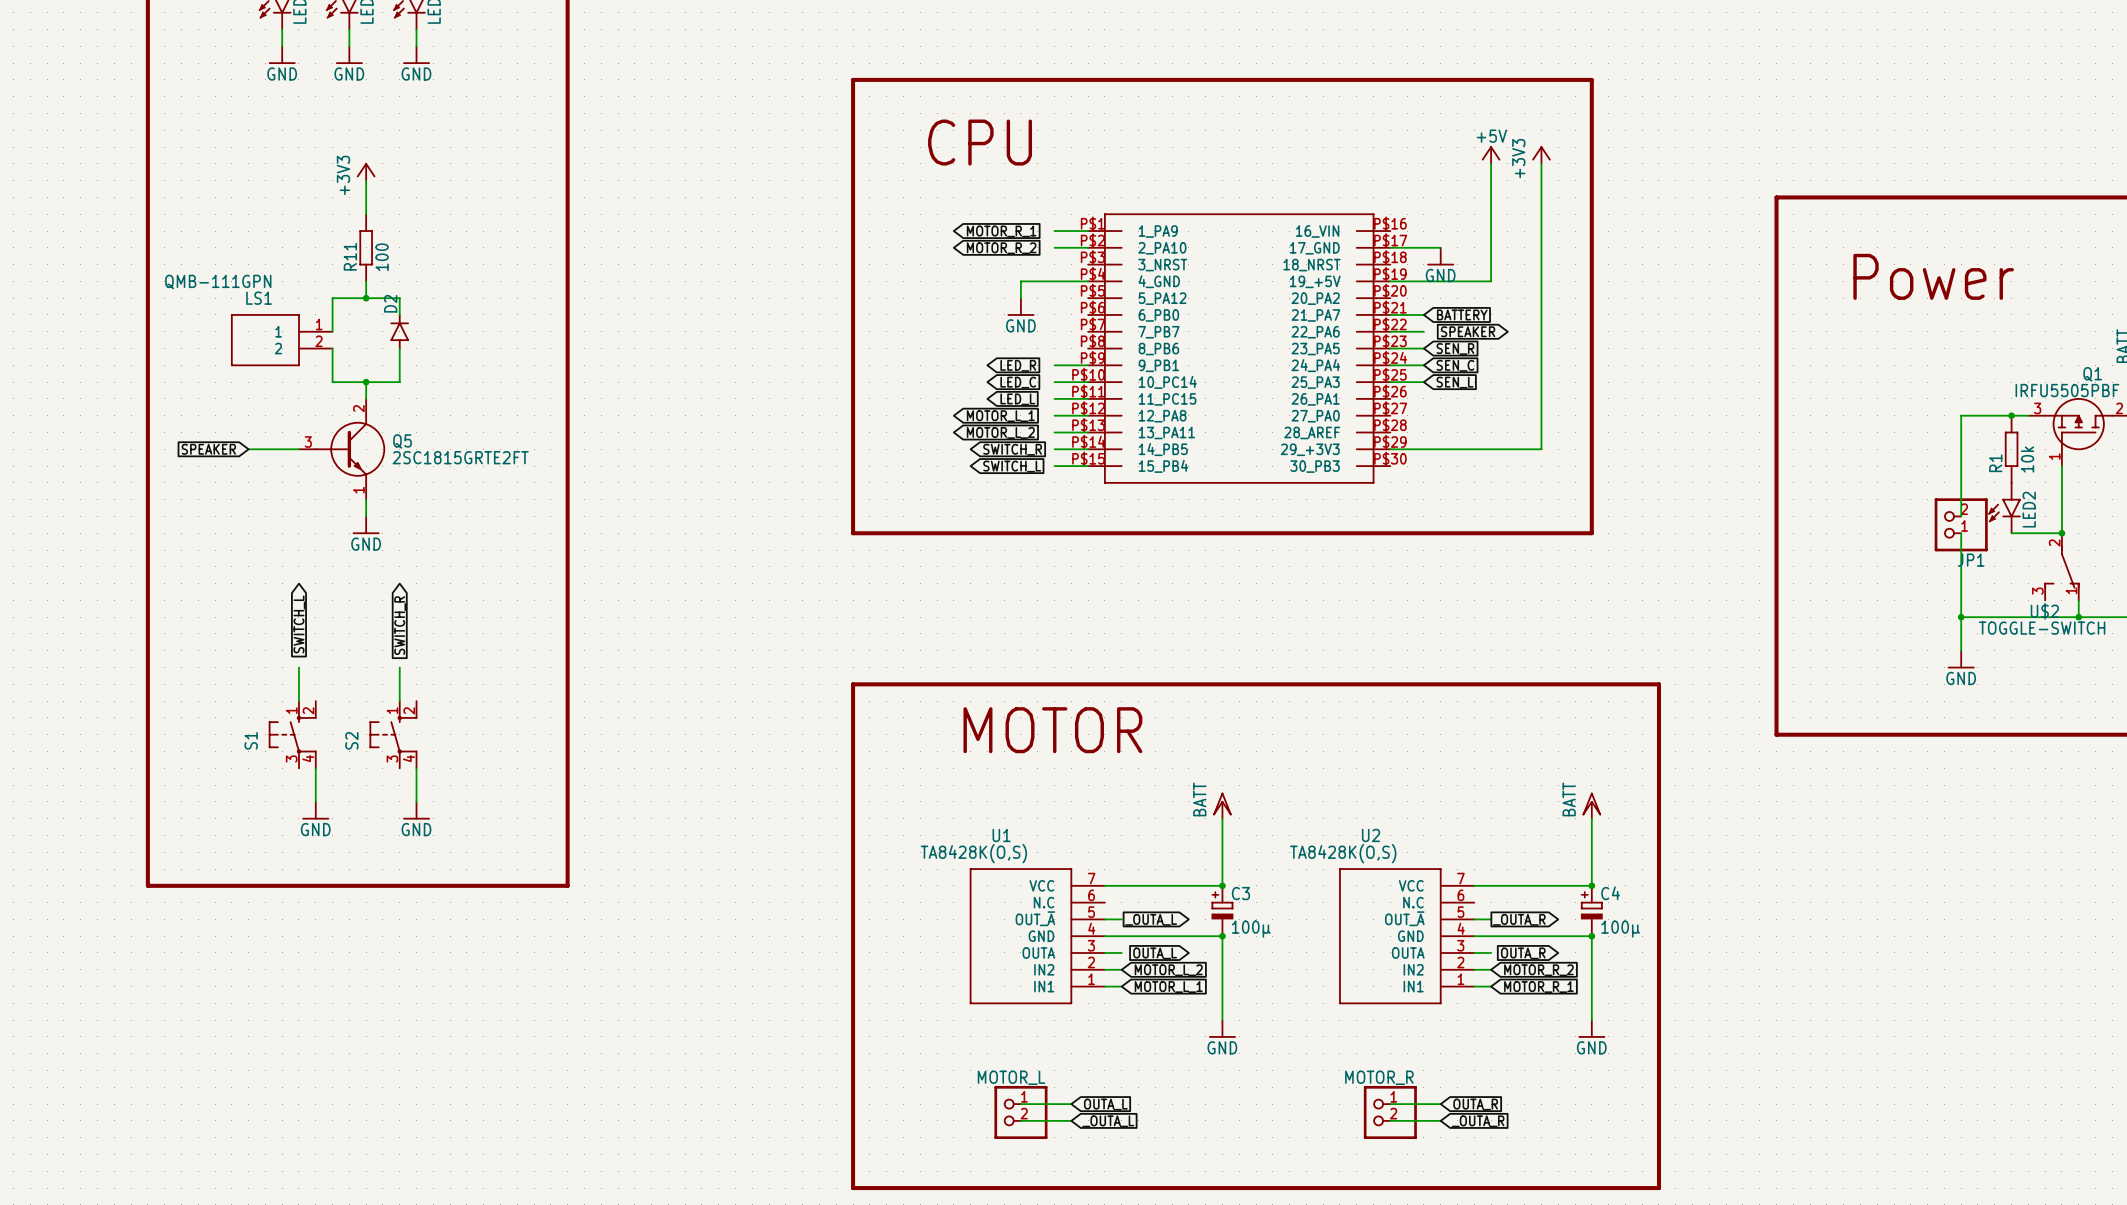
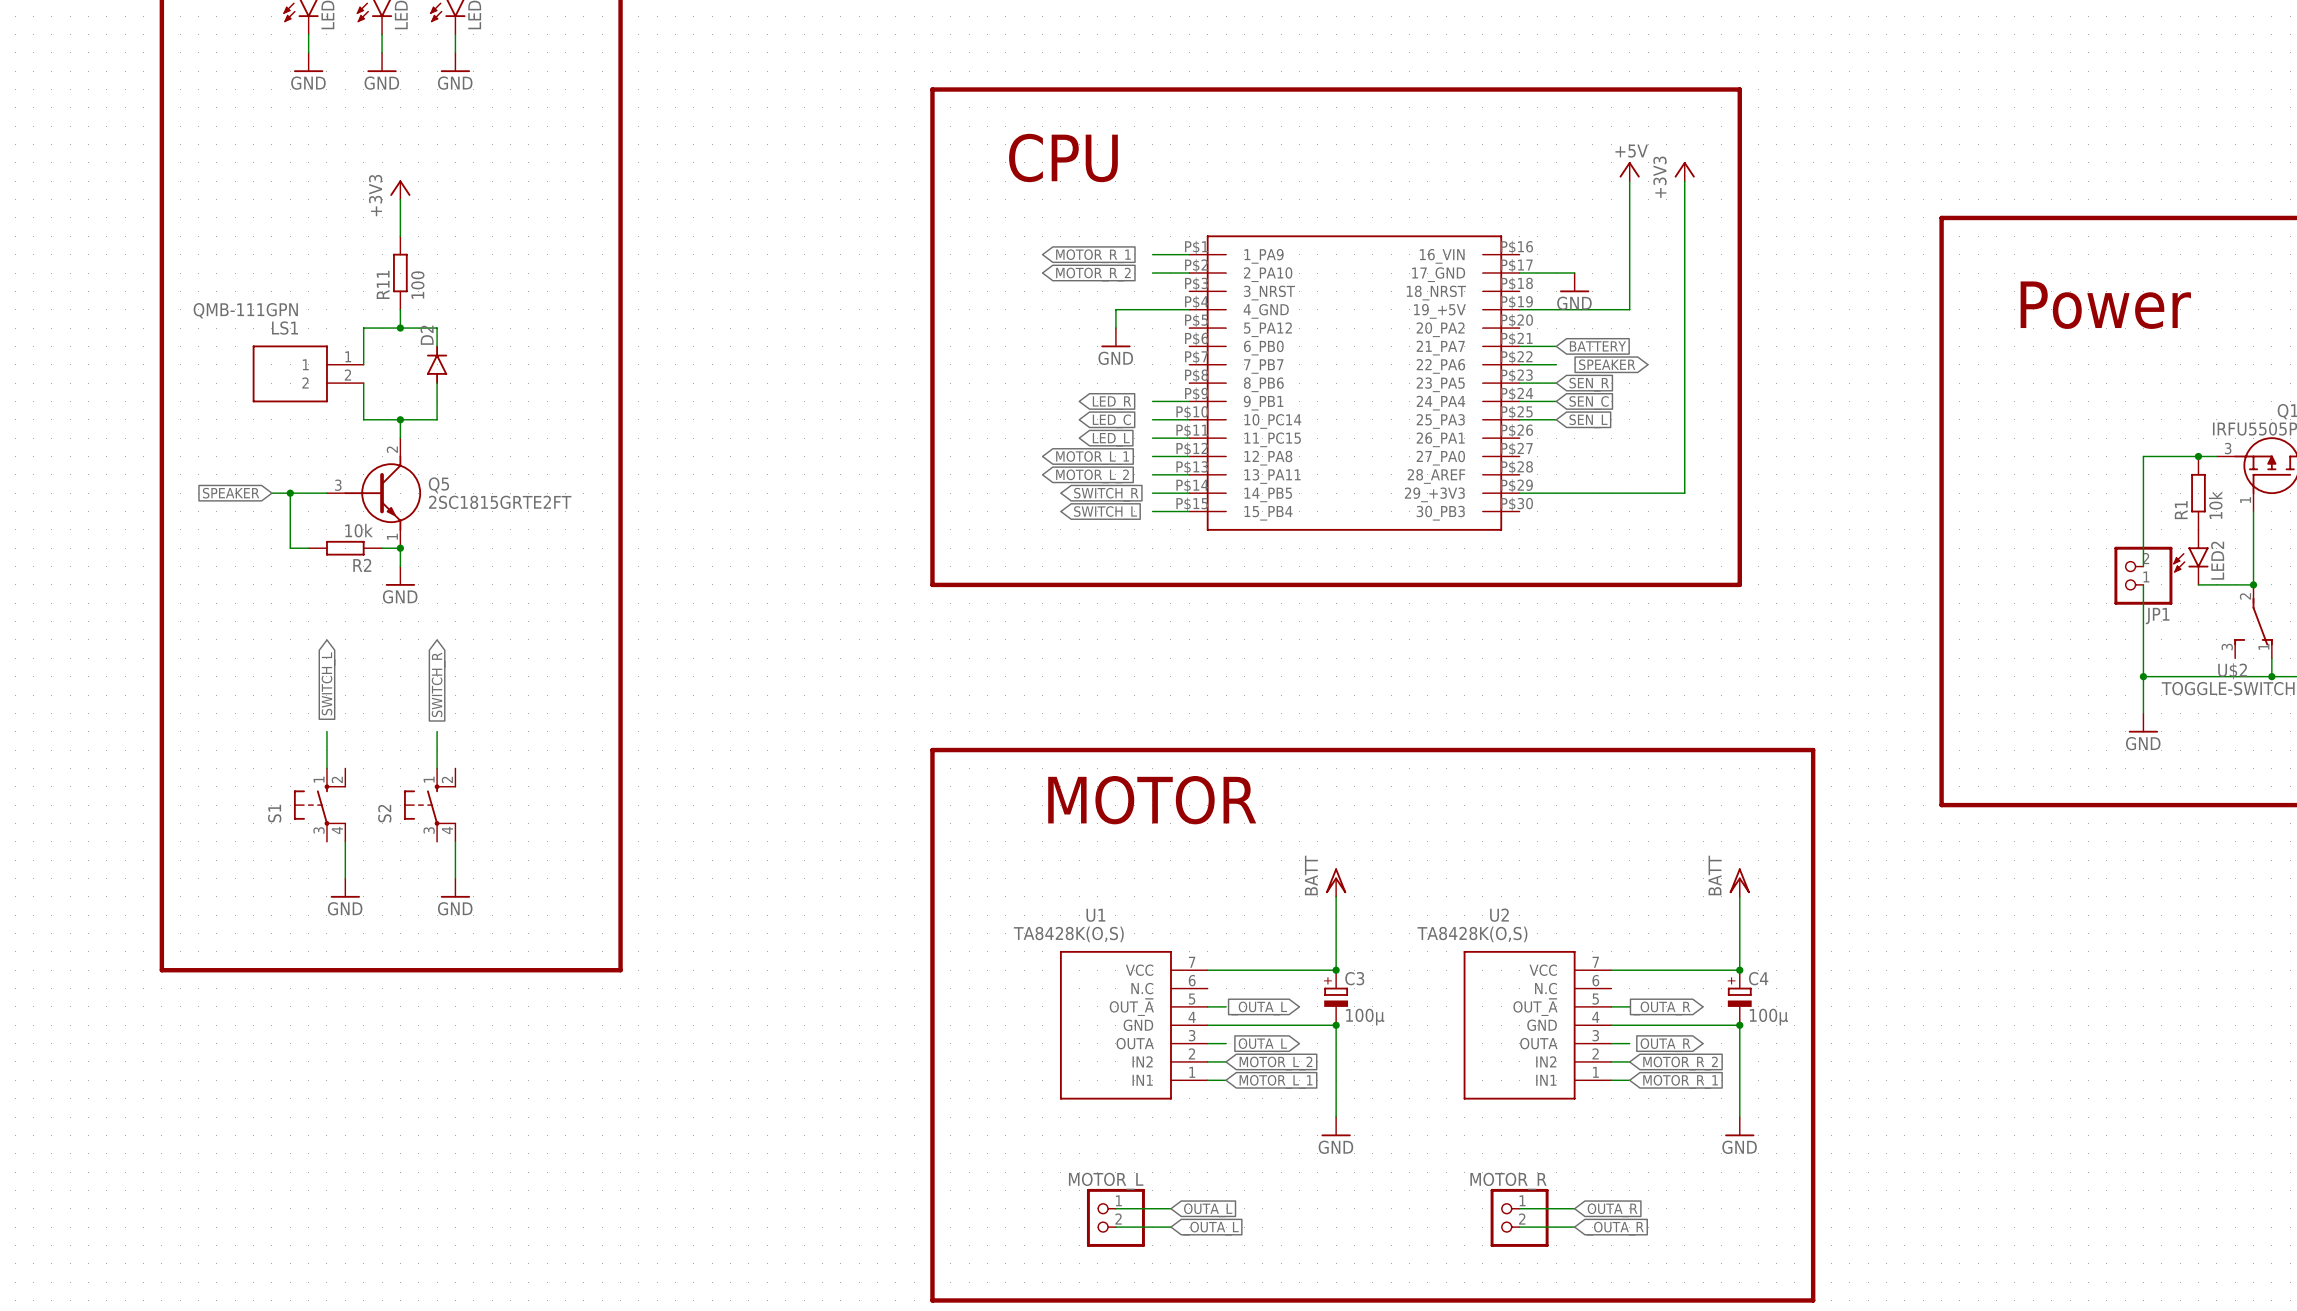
wire: none -> (290, 493) (290, 548) (308, 548)
junction: none -> (290, 493)
R2: none -> 10k (345, 548)
wire: none -> (382, 548) (400, 548)
junction: none -> (400, 548)

